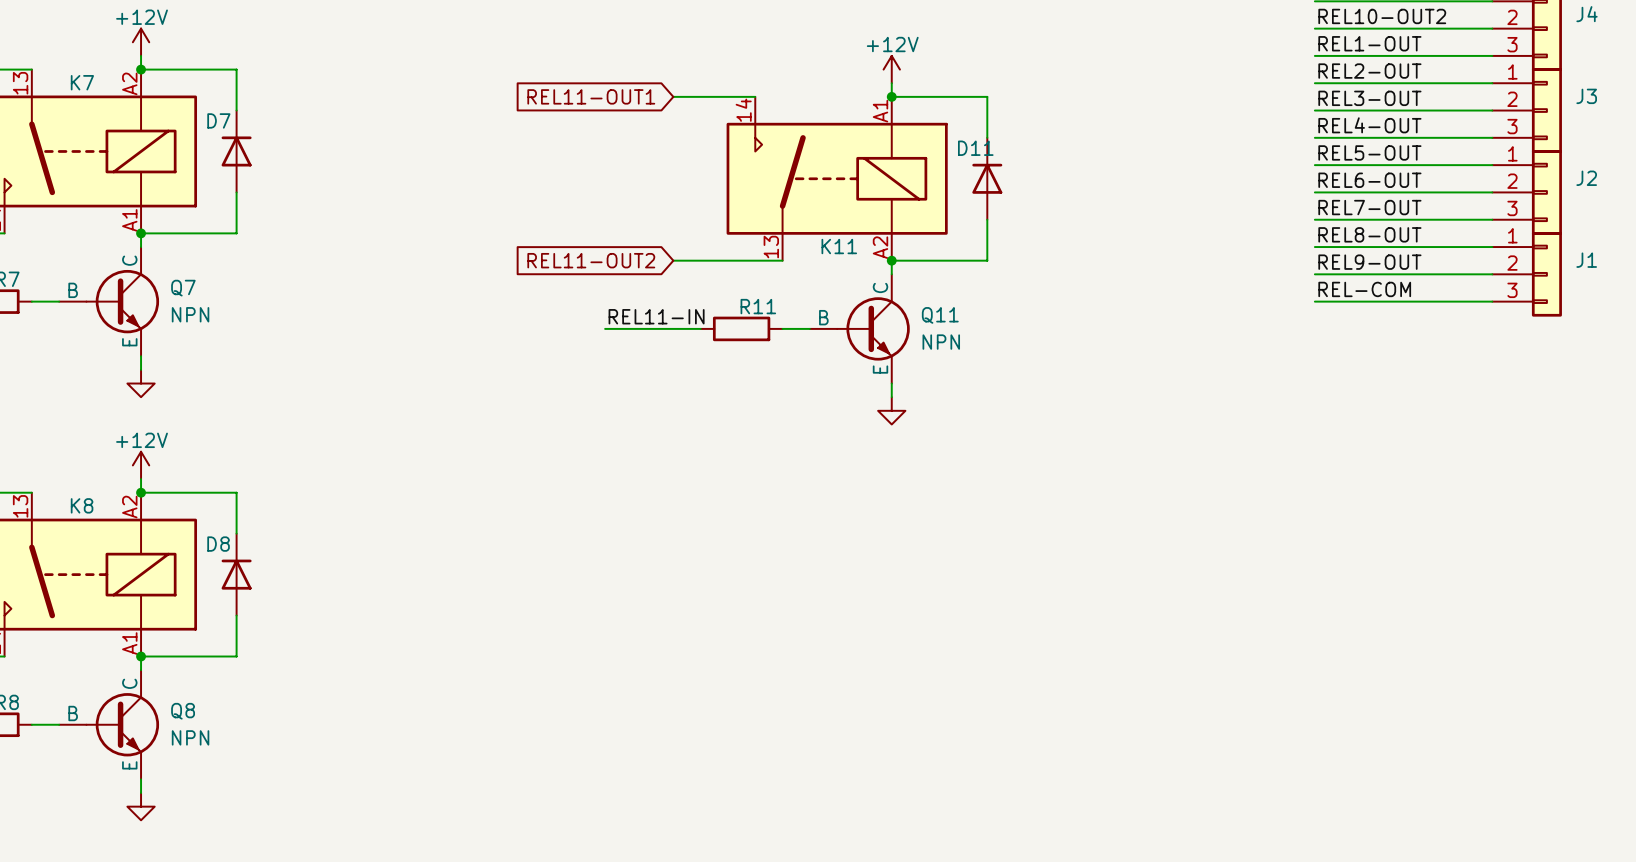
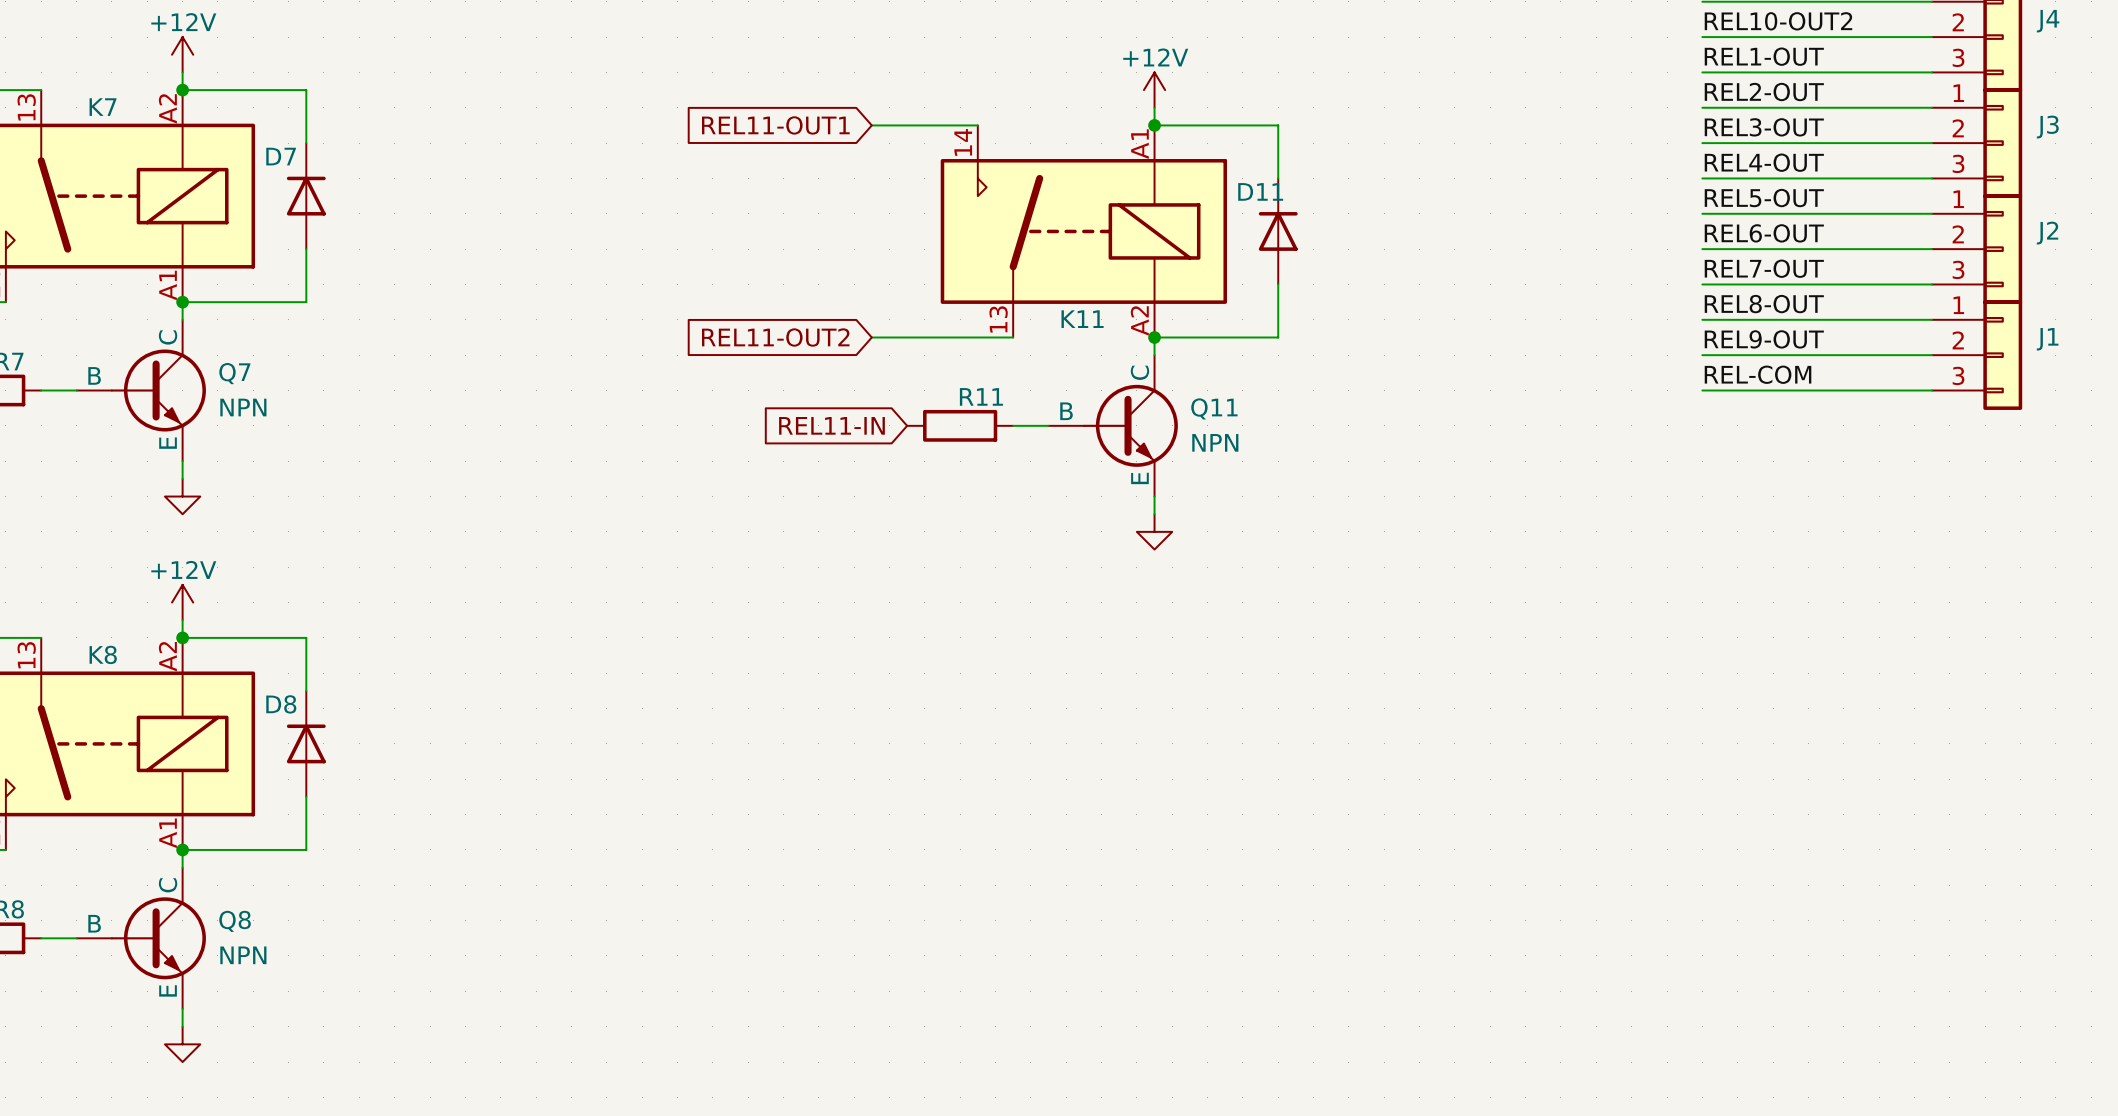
label: REL11-IN (656, 316) -> none
wire: (605, 328) (700, 328) -> none
global label: none -> REL11-IN (831, 425)

